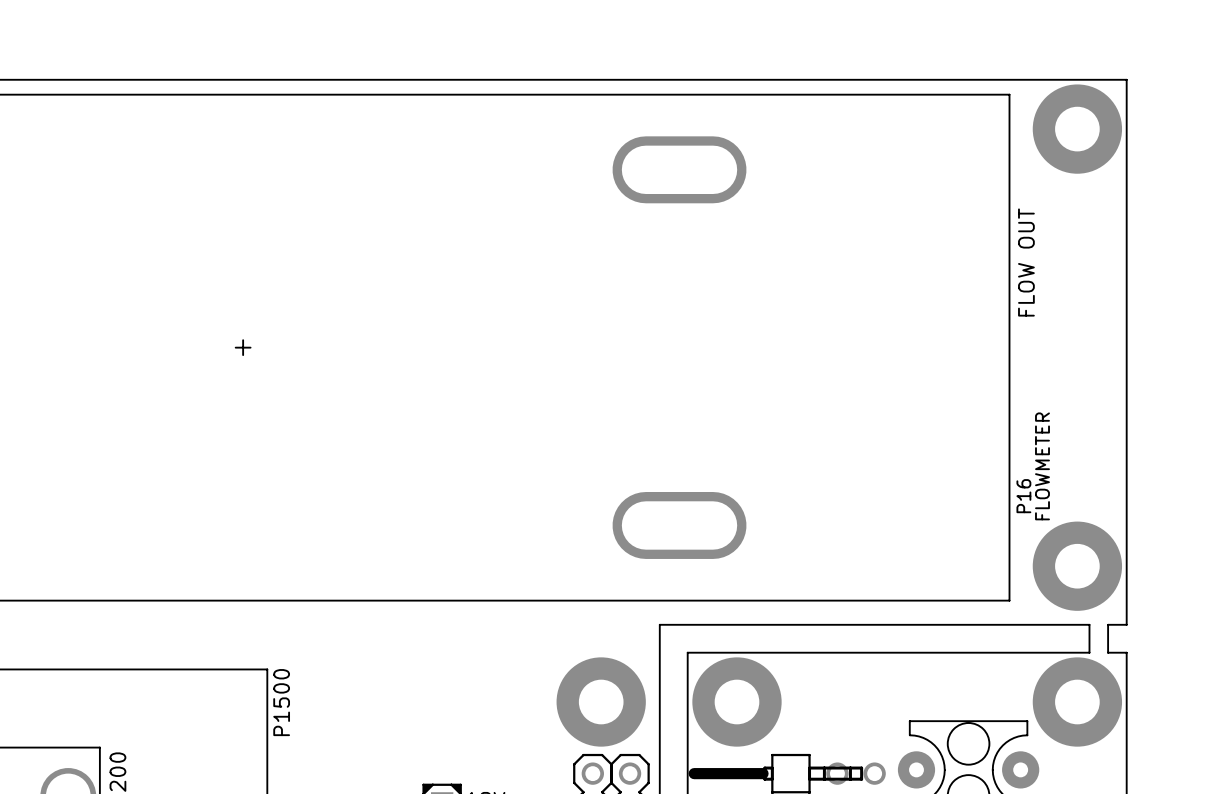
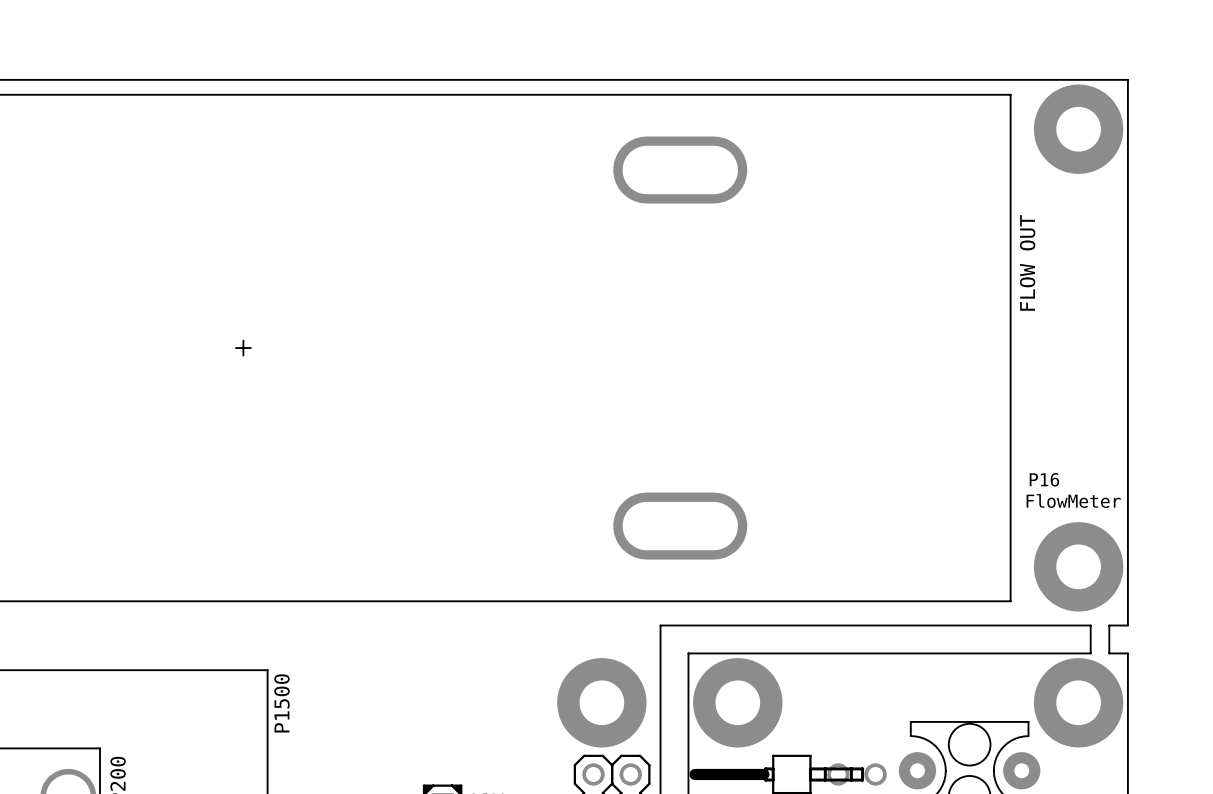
P16 value: FLOWMETER (1042, 466) -> FlowMeter (1073, 500)
P16 name rotation: 0° (1023, 496) -> 90° clockwise (1044, 479)

